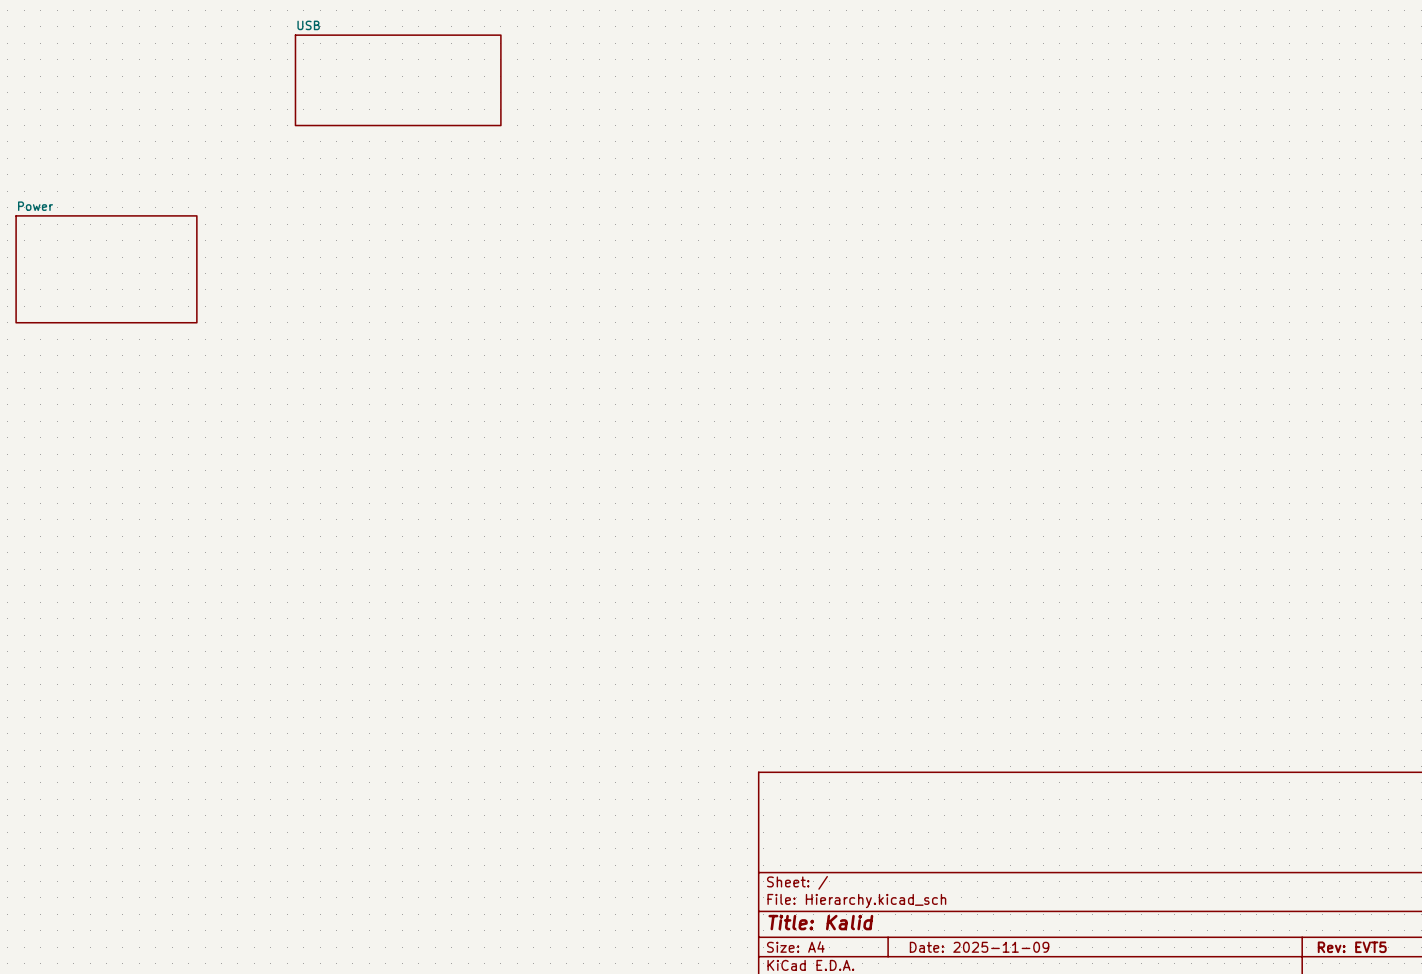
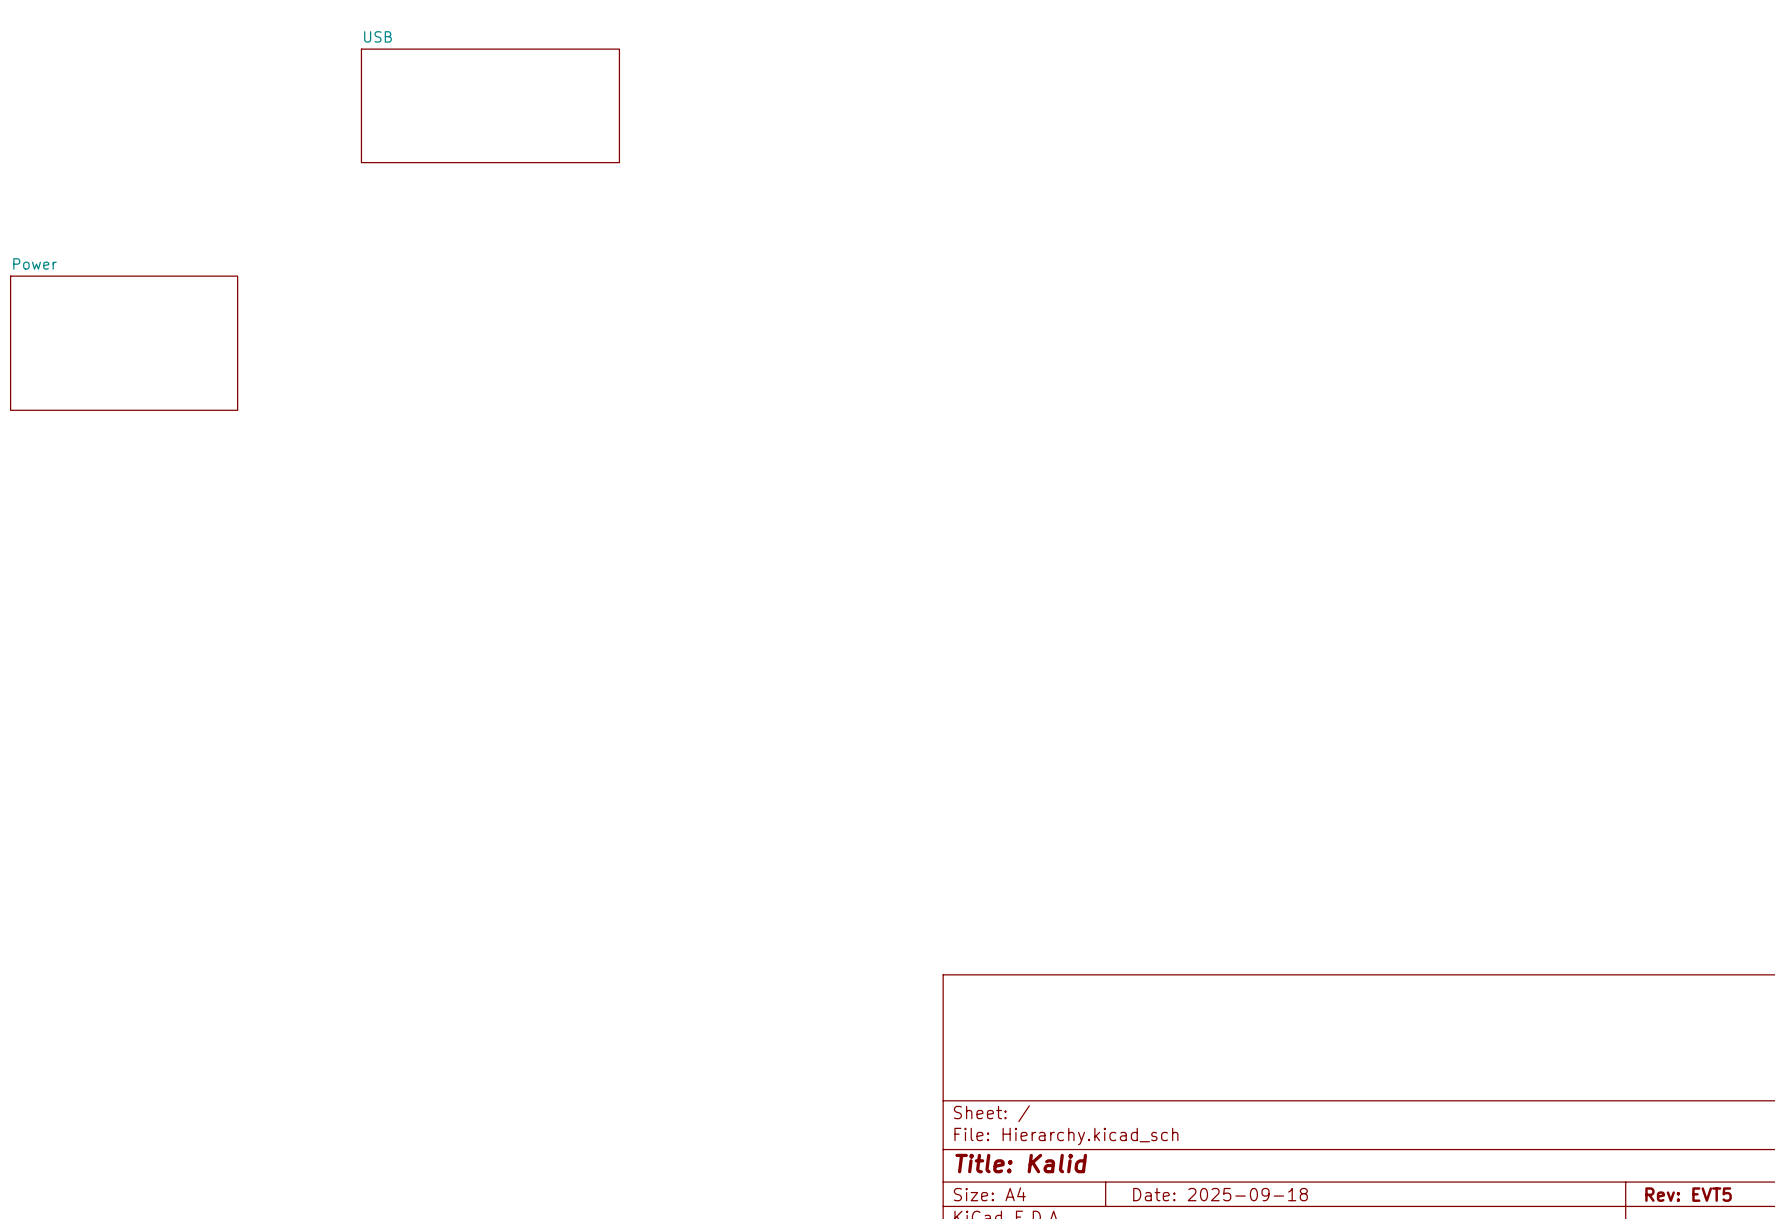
title block: Date: 2025-11-09 (979, 947) -> Date: 2025-09-18 (1220, 1194)

